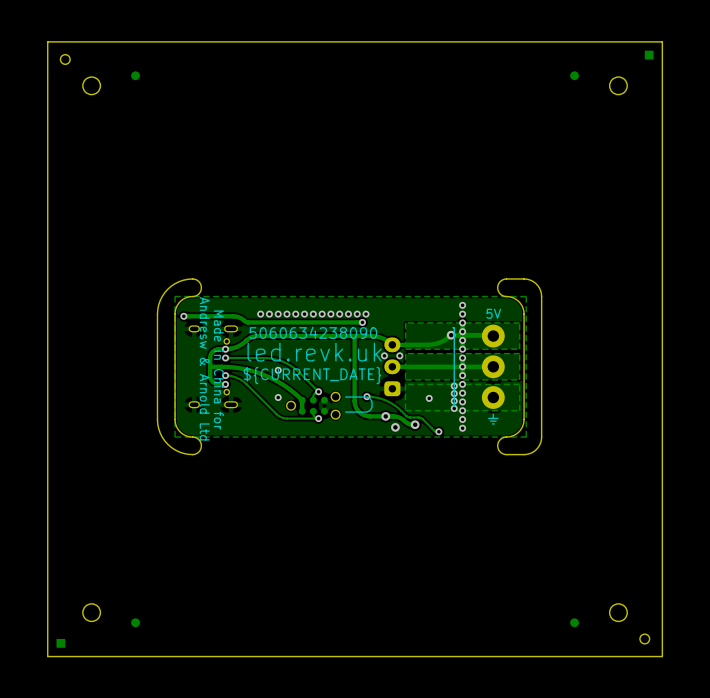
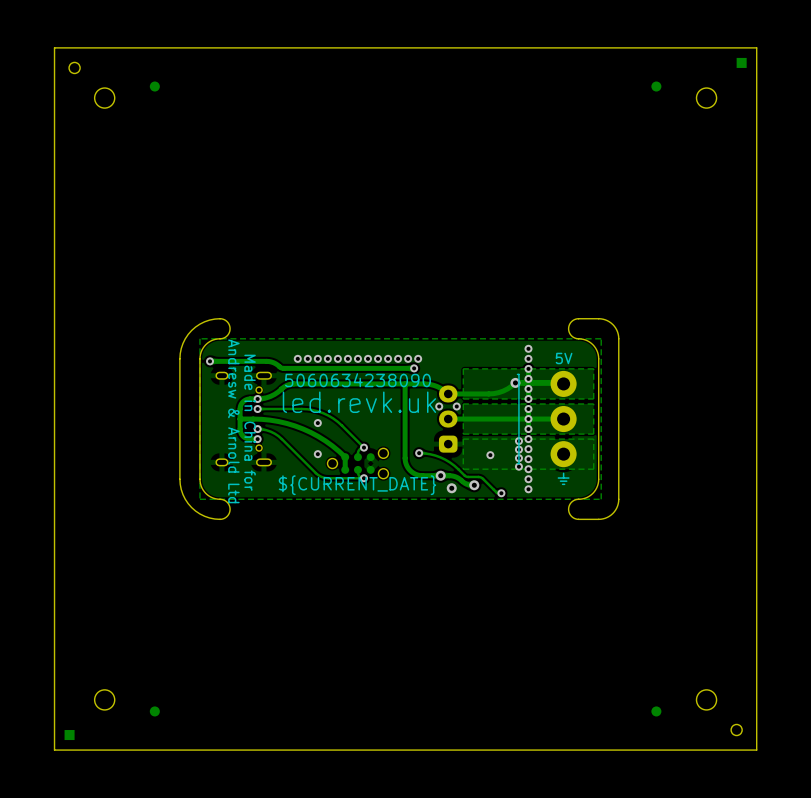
text position: ${CURRENT_DATE} (312, 375) -> ${CURRENT_DATE} (357, 485)
text: U (358, 404) -> none

